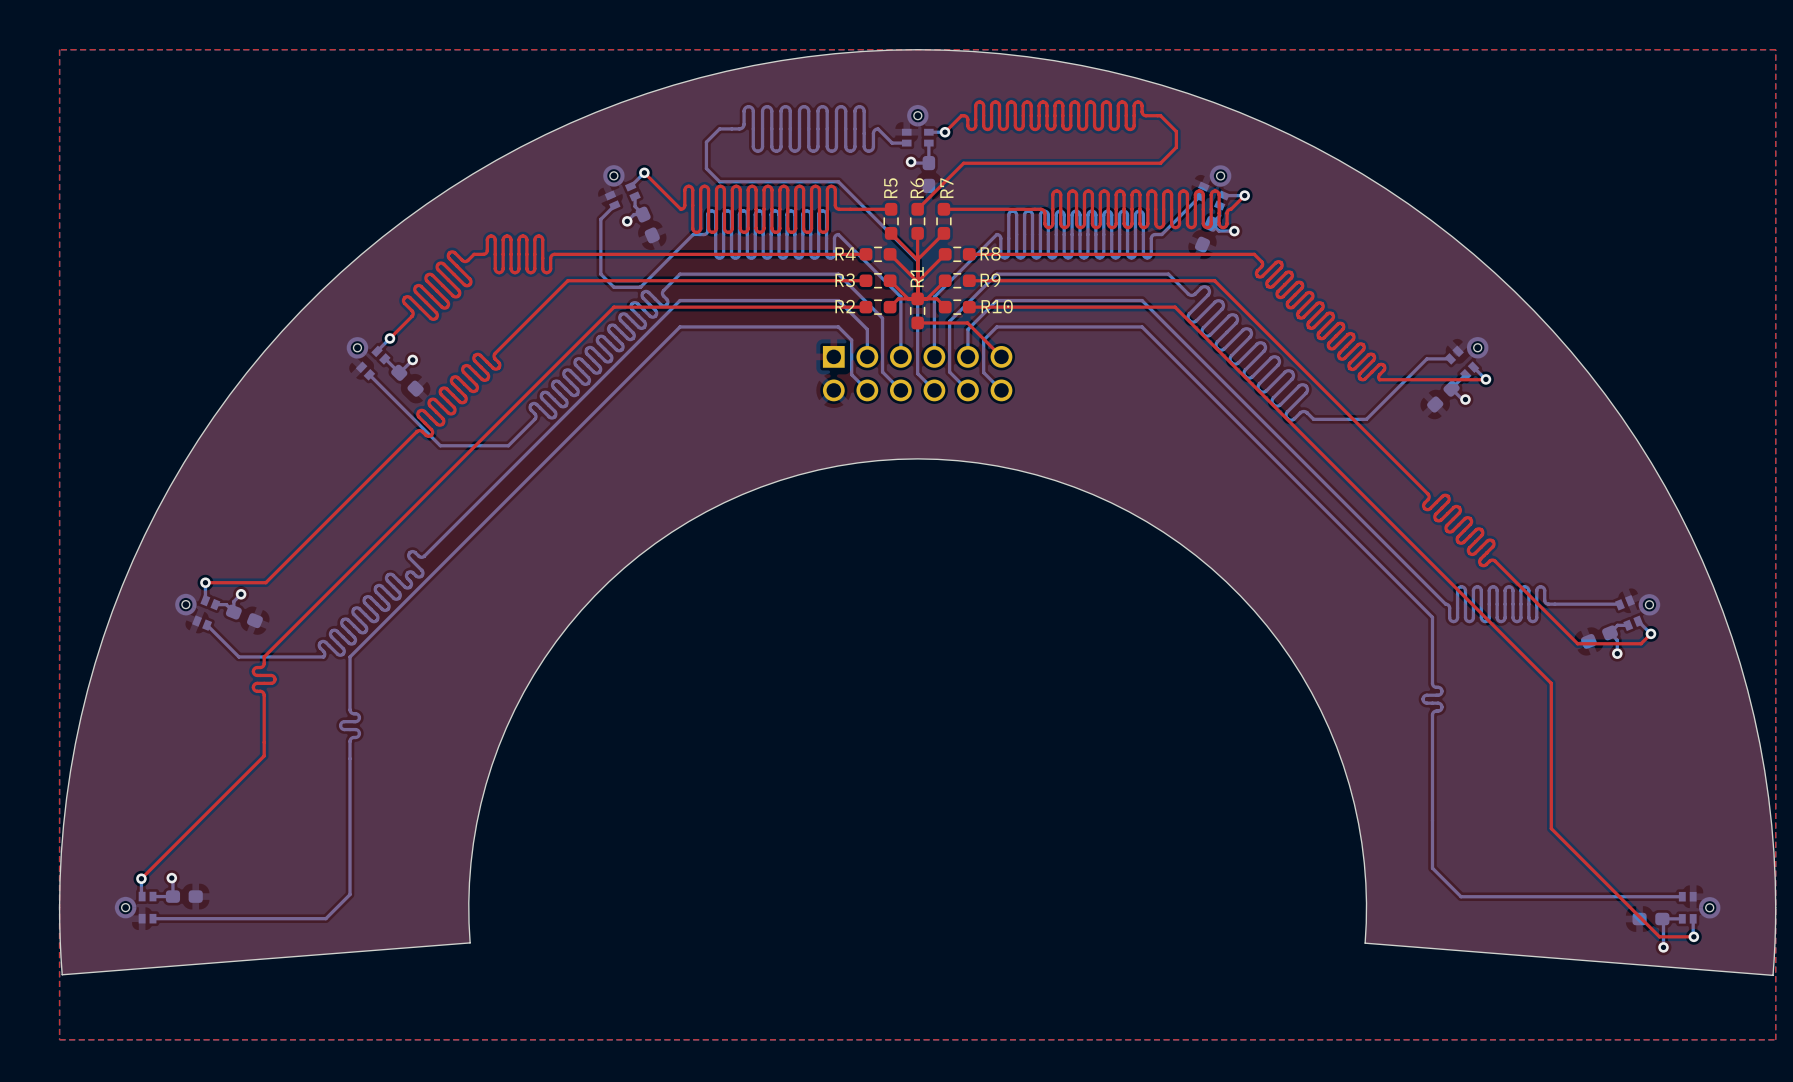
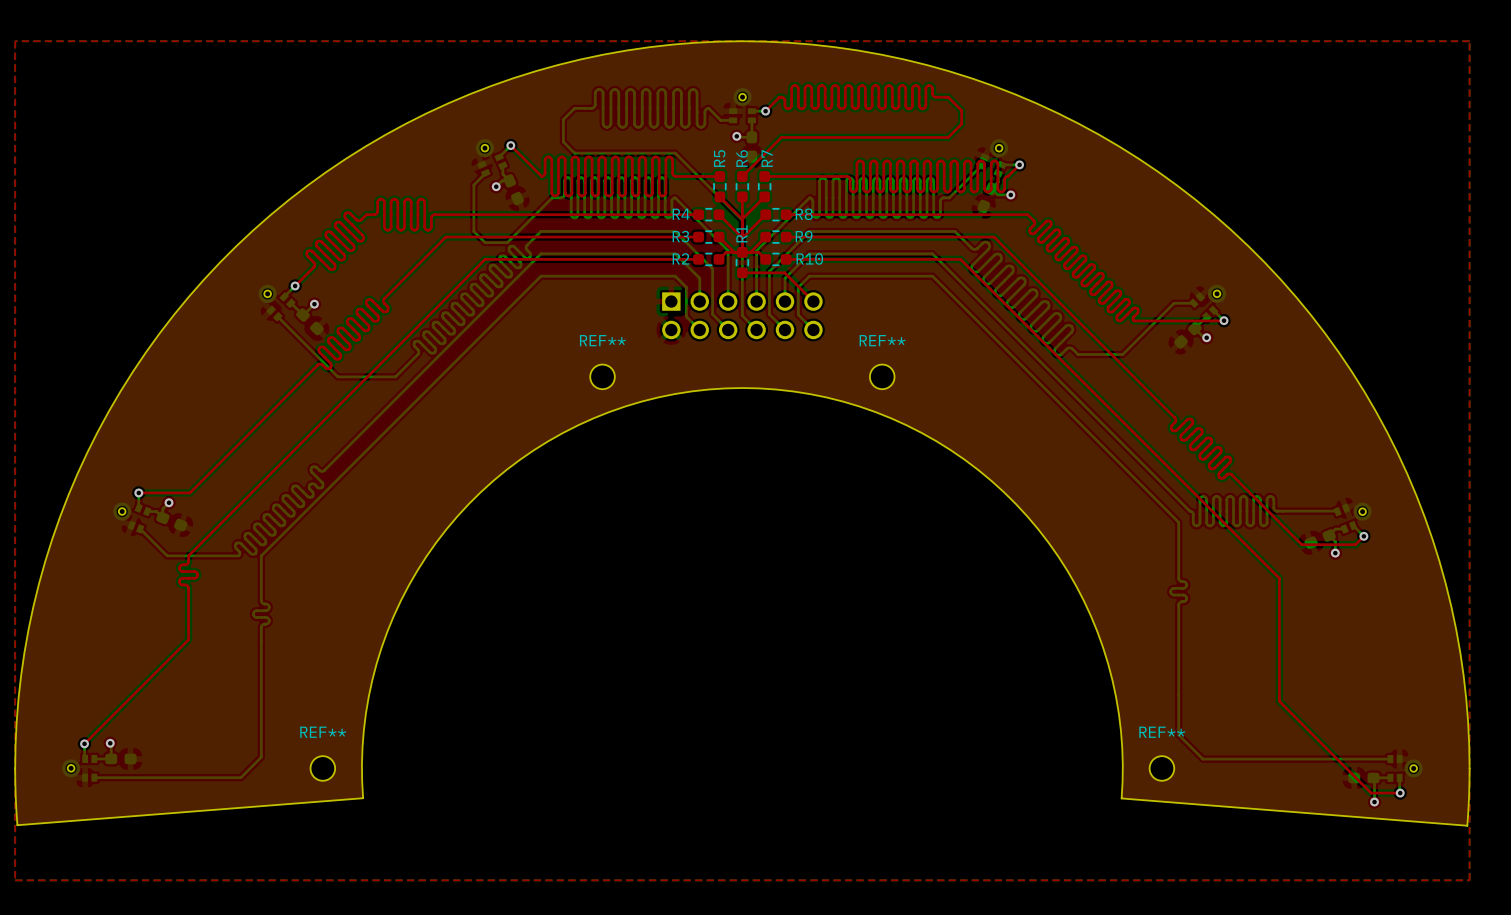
REF**: none -> (602, 376)
REF**: none -> (882, 376)
REF**: none -> (322, 768)
REF**: none -> (1161, 768)

